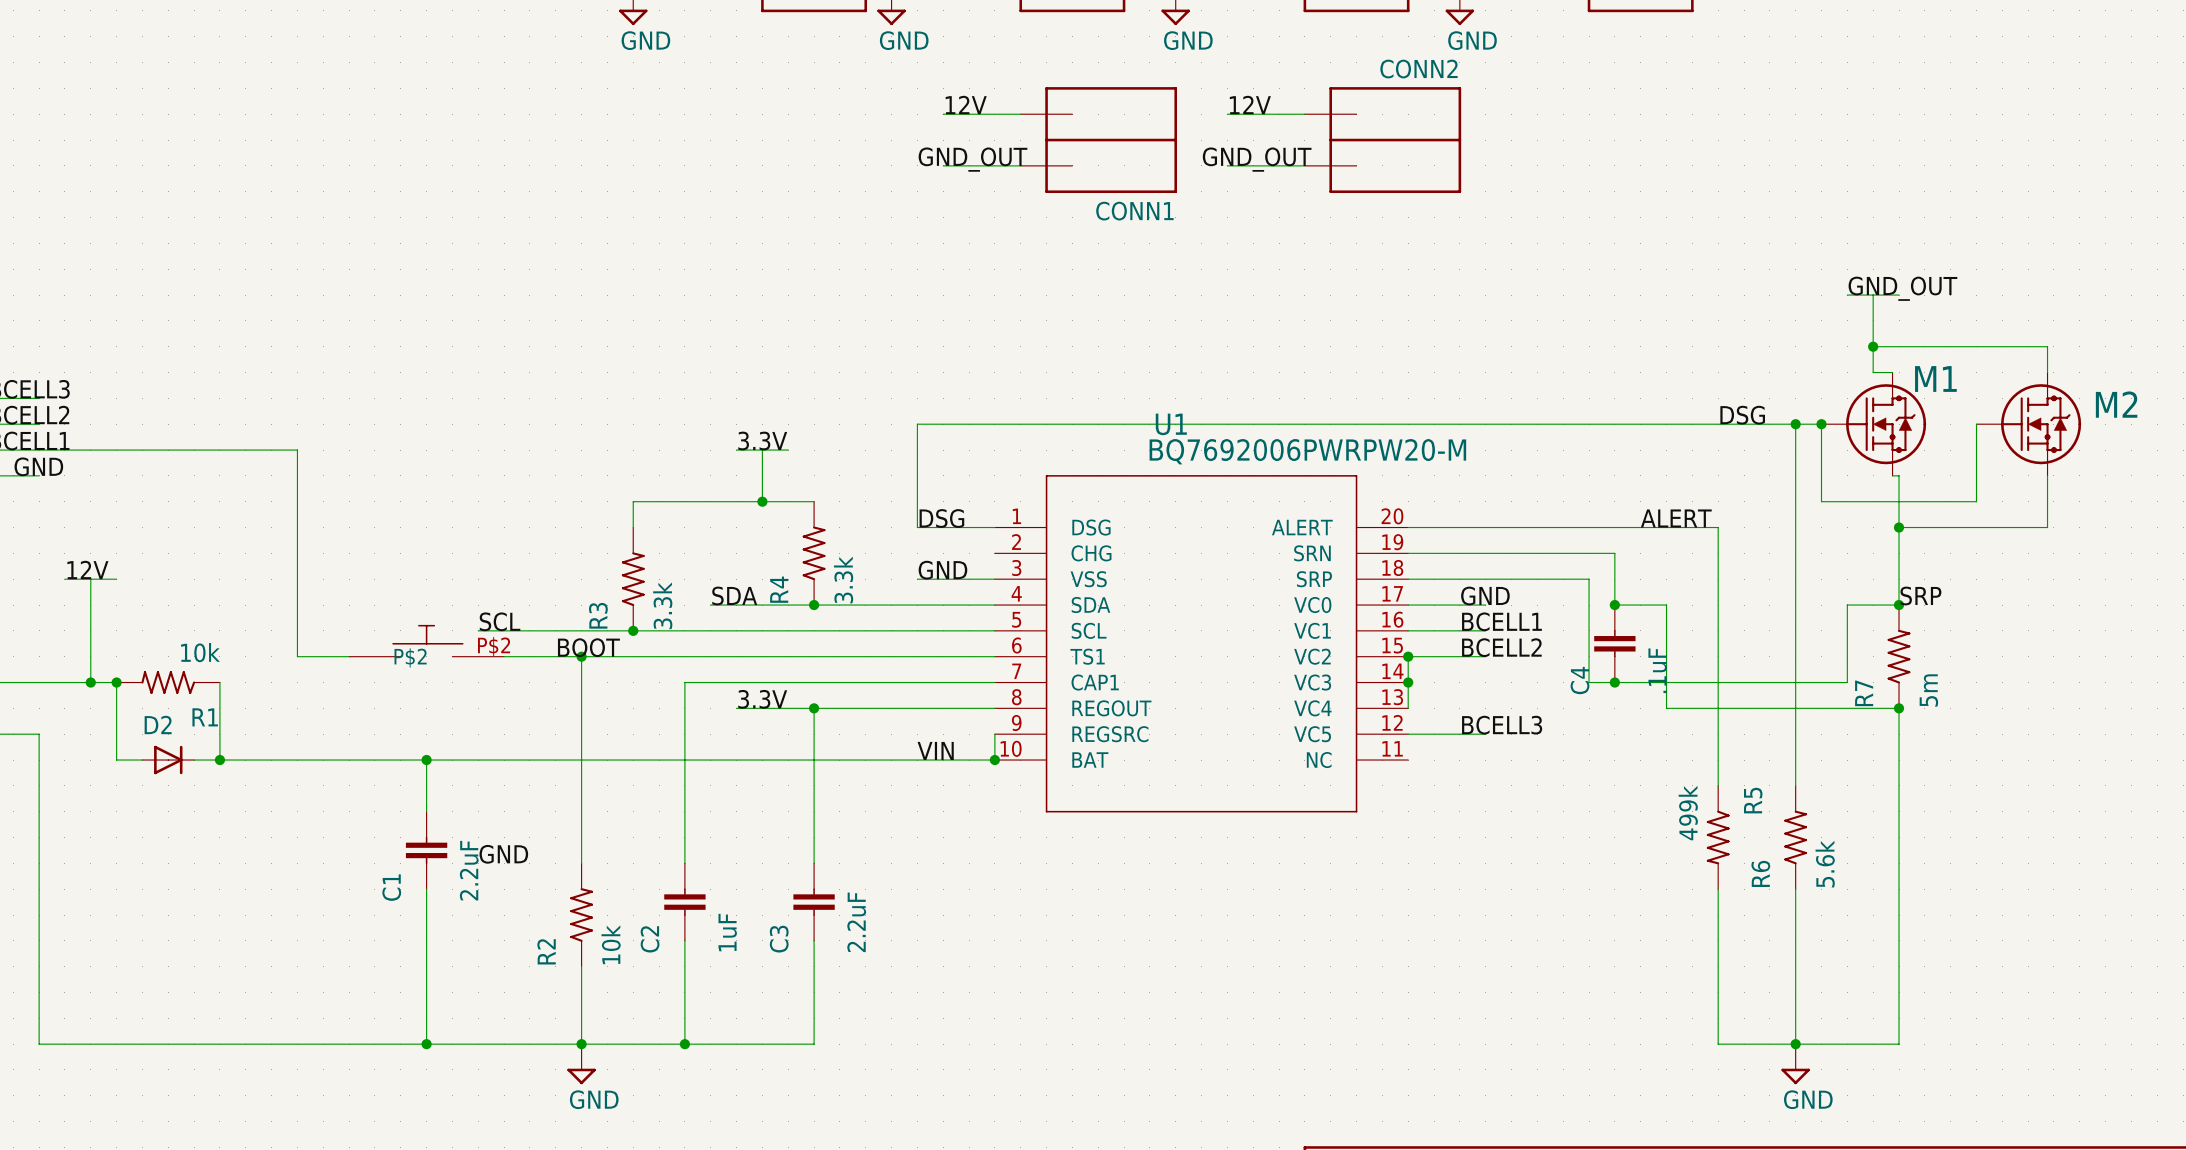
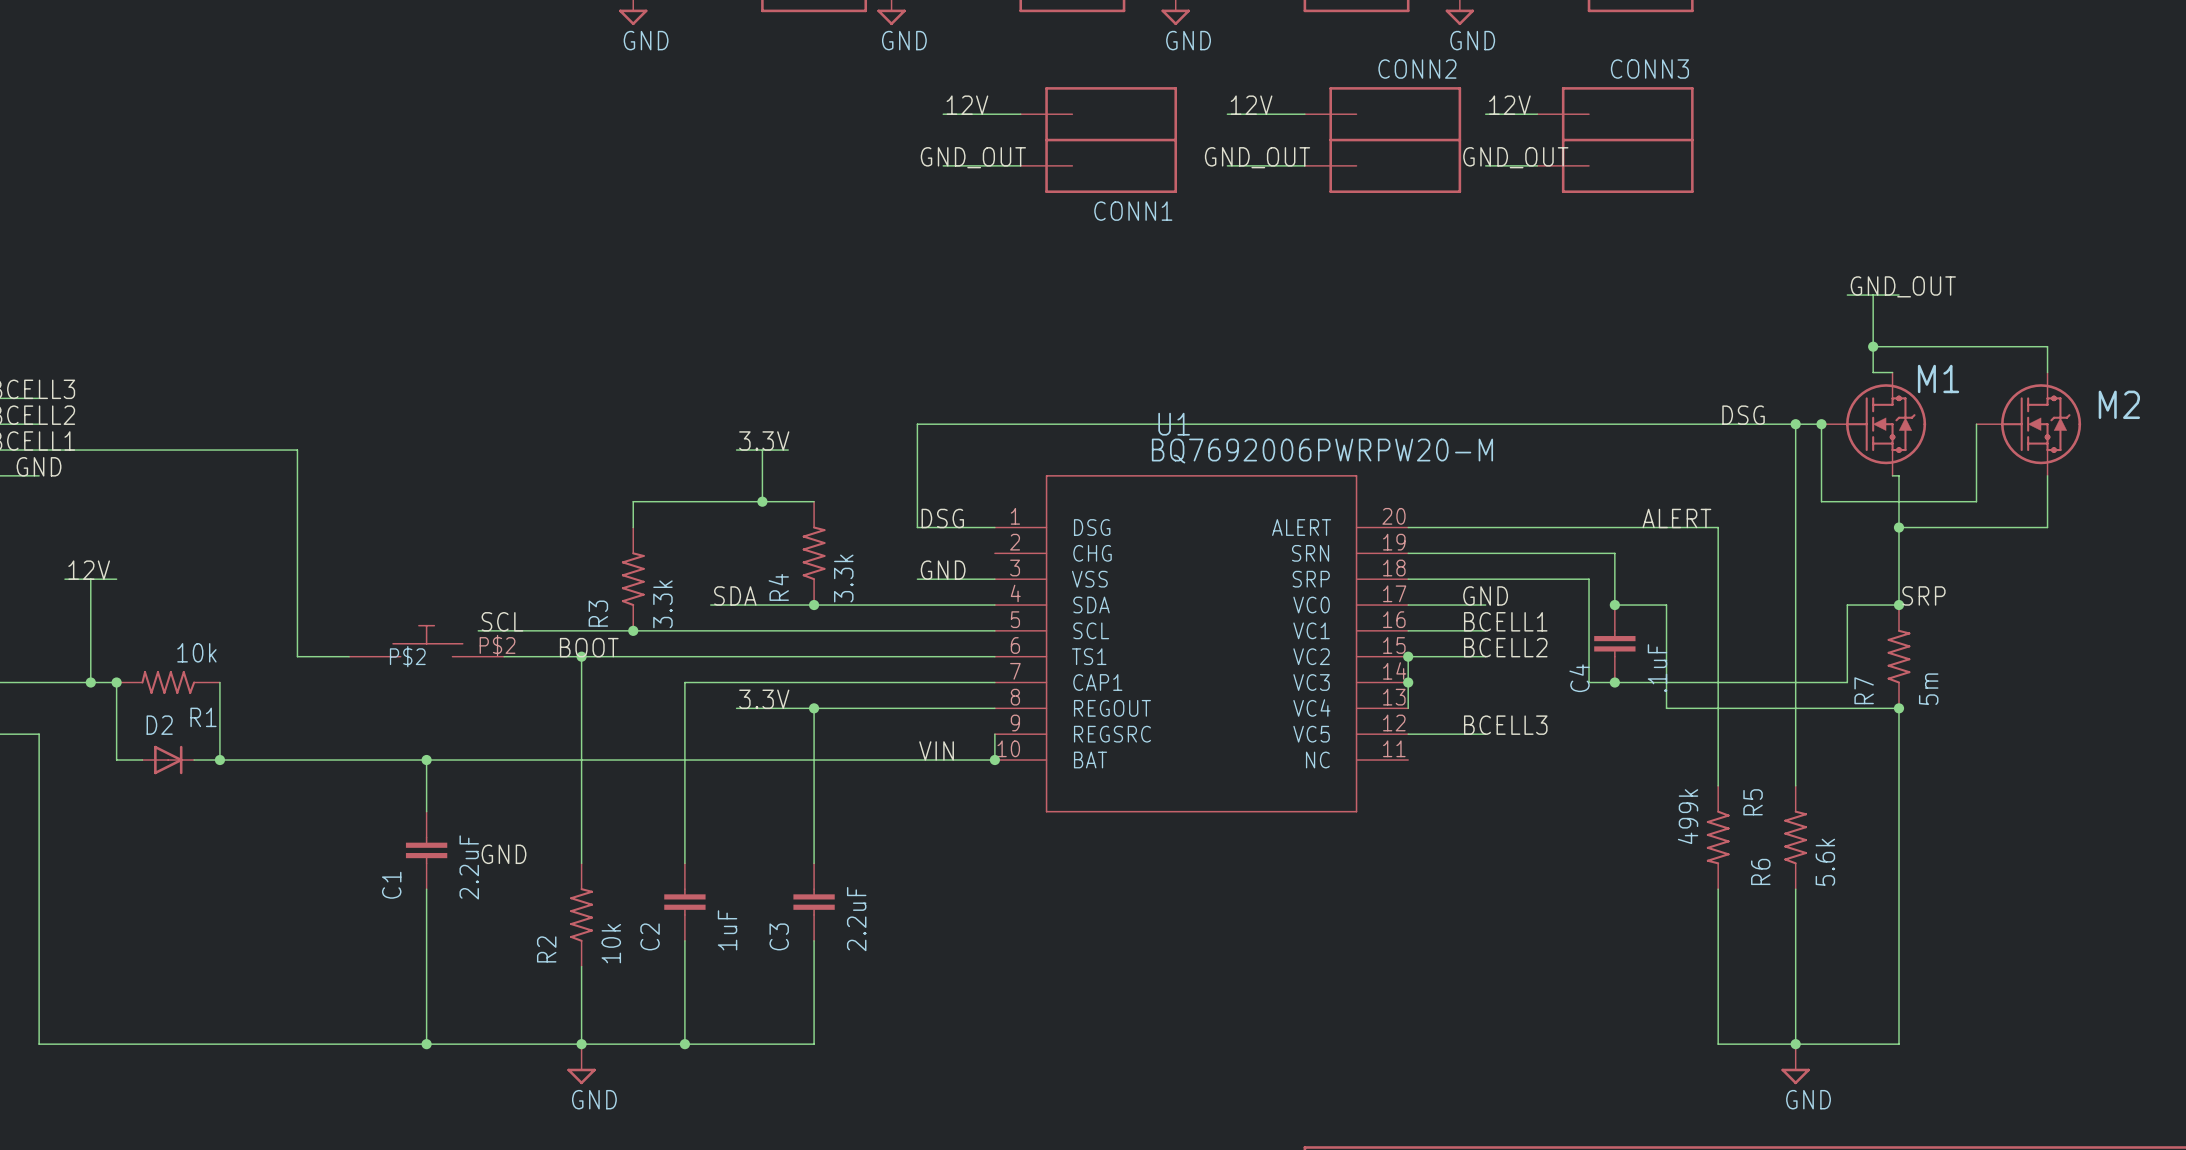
label: none -> 12V (1509, 105)
wire: none -> (1485, 114) (1537, 114)
CONN3: none -> (1615, 140)
label: none -> GND_OUT (1515, 157)
wire: none -> (1485, 165) (1537, 165)

